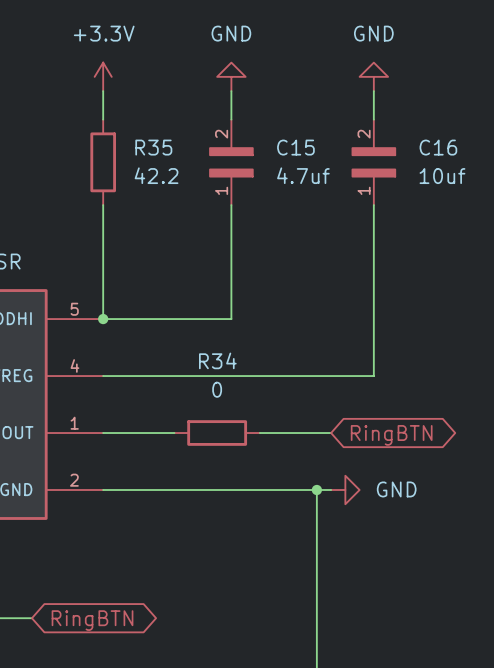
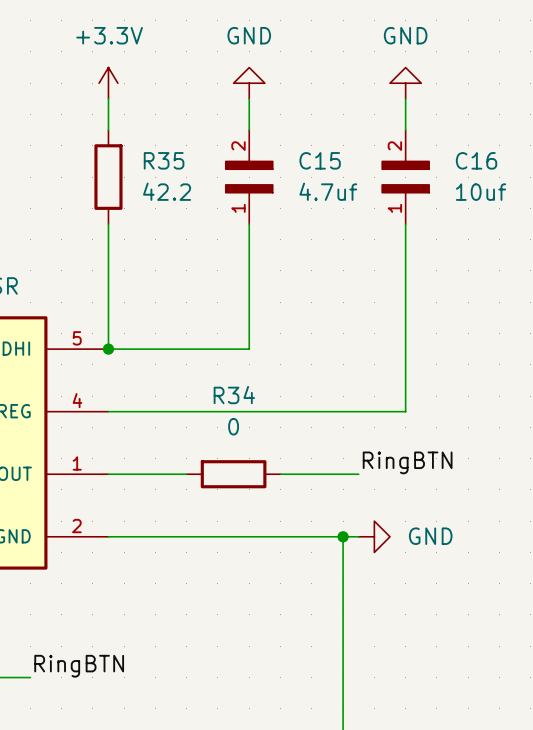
label: none -> RingBTN (407, 462)
global label: RingBTN (391, 435) -> none
label: none -> RingBTN (79, 666)
global label: RingBTN (92, 620) -> none

